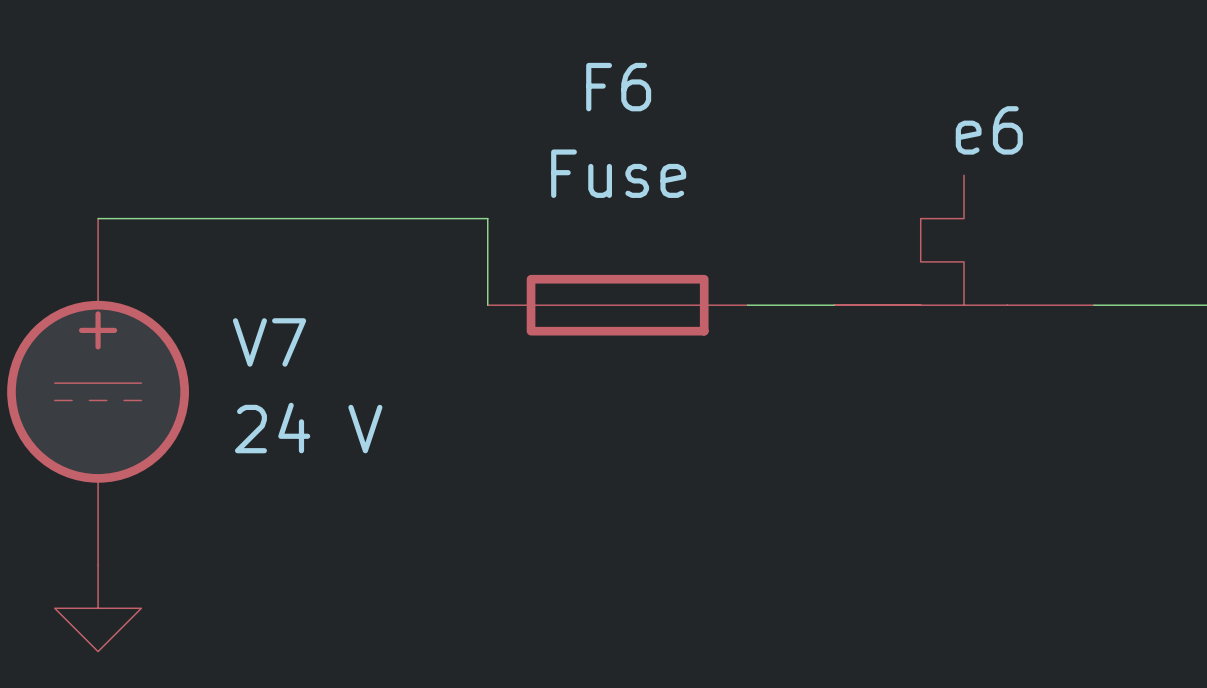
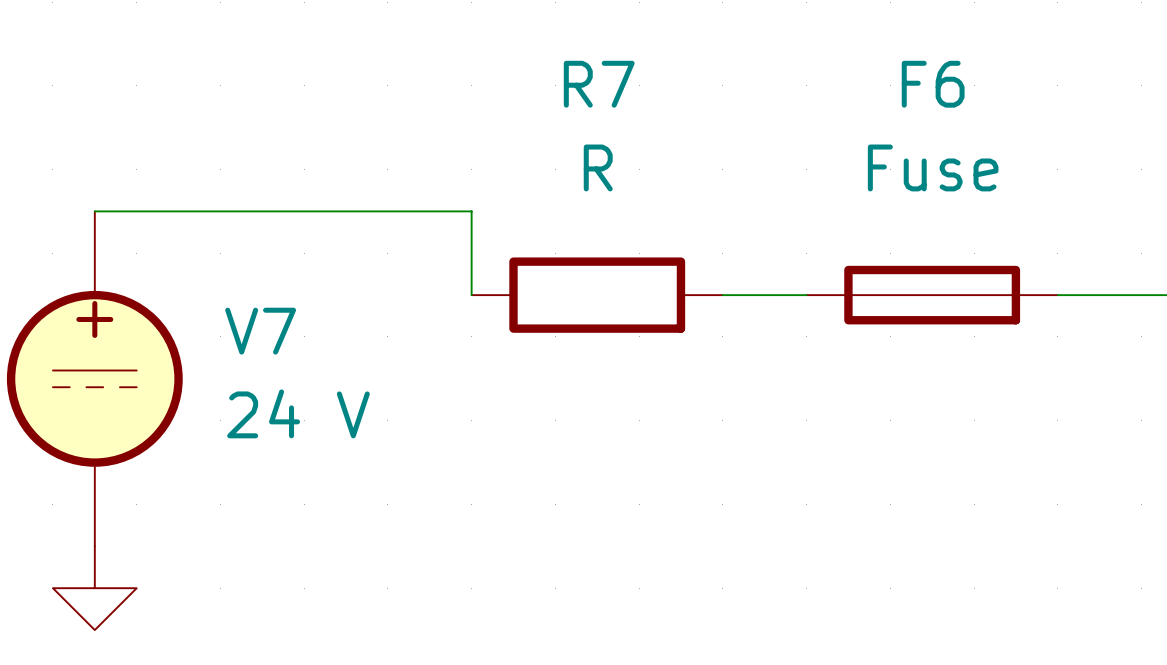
e6: (964, 240) -> none
F6 position: (617, 305) -> (932, 295)
R7: none -> R (597, 295)

